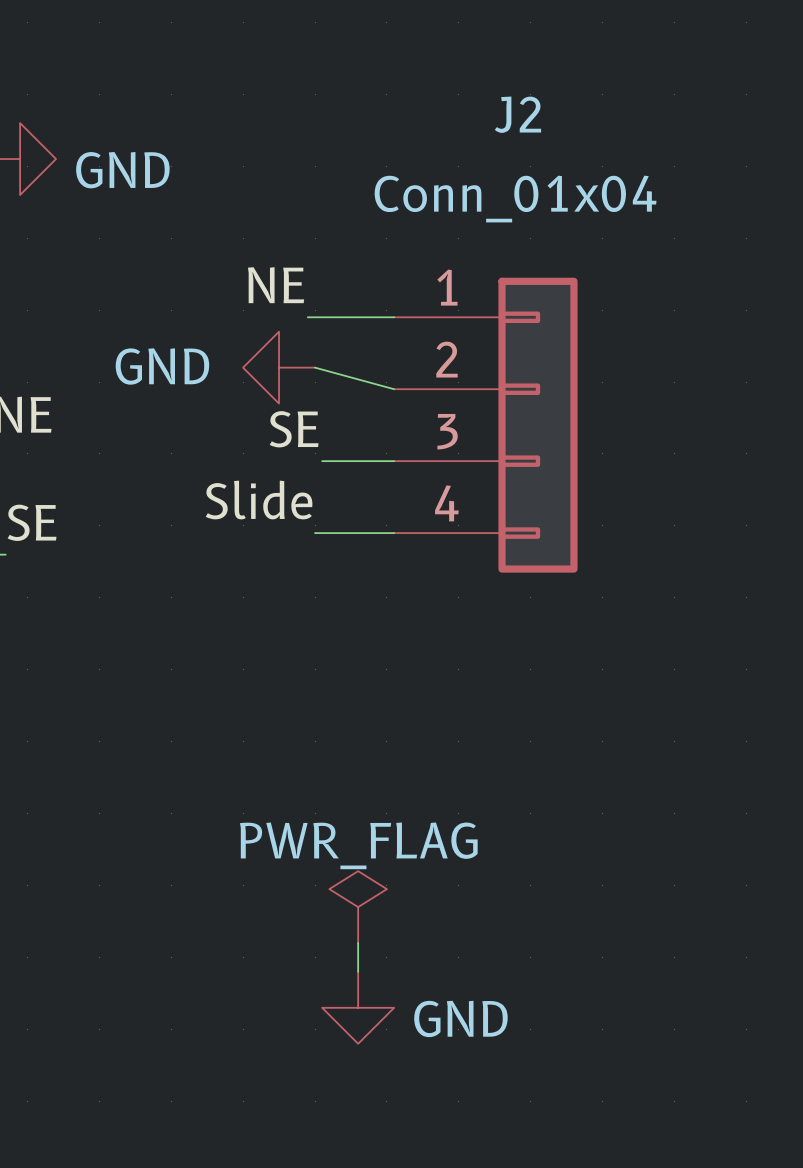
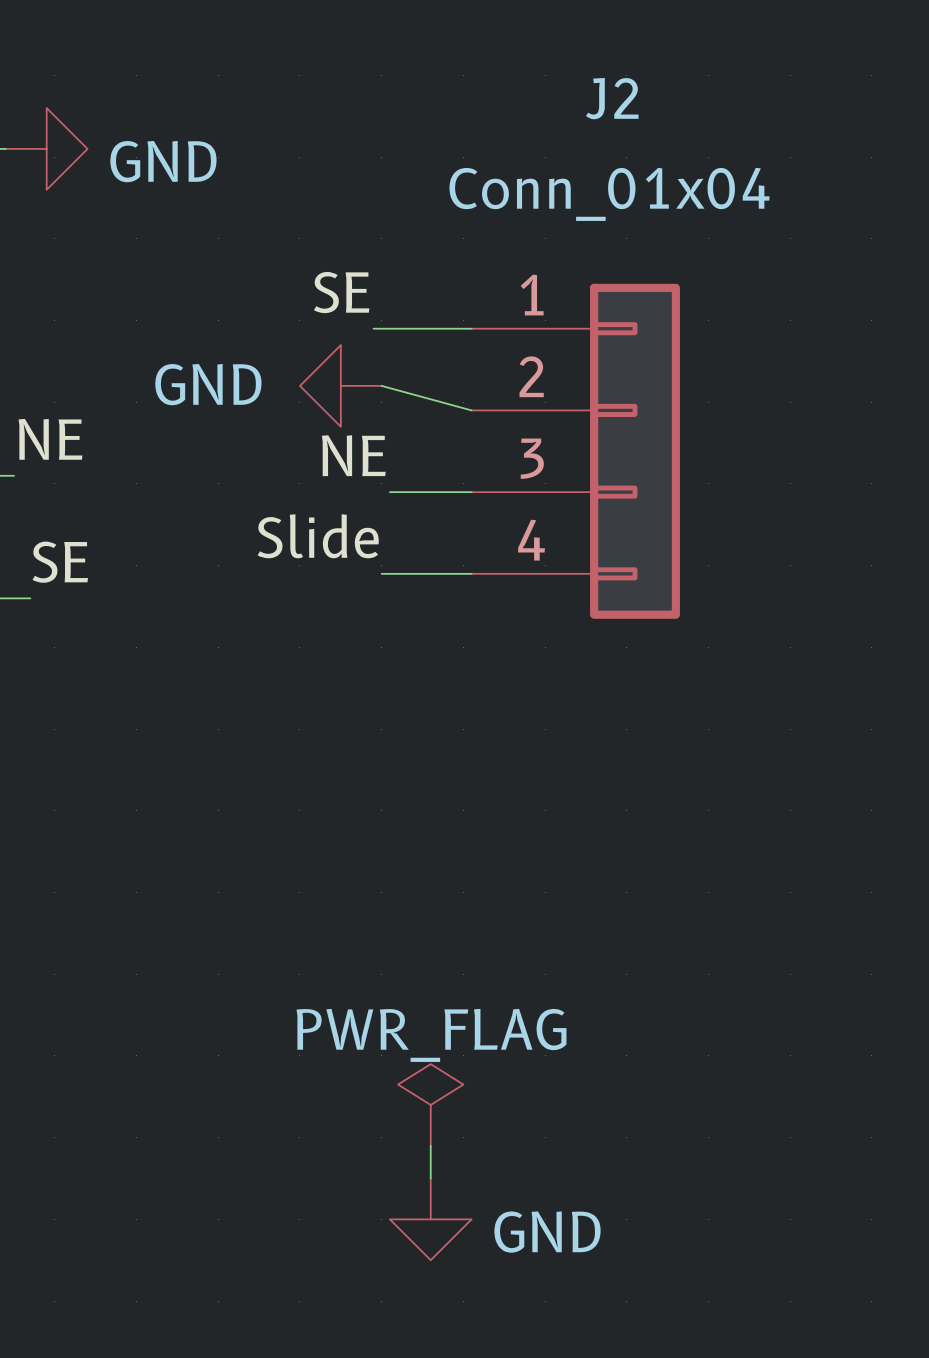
label: NE (276, 285) -> SE (341, 292)
label: SE (294, 429) -> NE (353, 455)
power symbol: PWR_FLAG (358, 907) -> none
wire: (358, 943) (358, 971) -> (430, 1145) (430, 1178)
power symbol: GND (358, 1007) -> PWR_FLAG (430, 1104)
power symbol: none -> GND (430, 1219)

